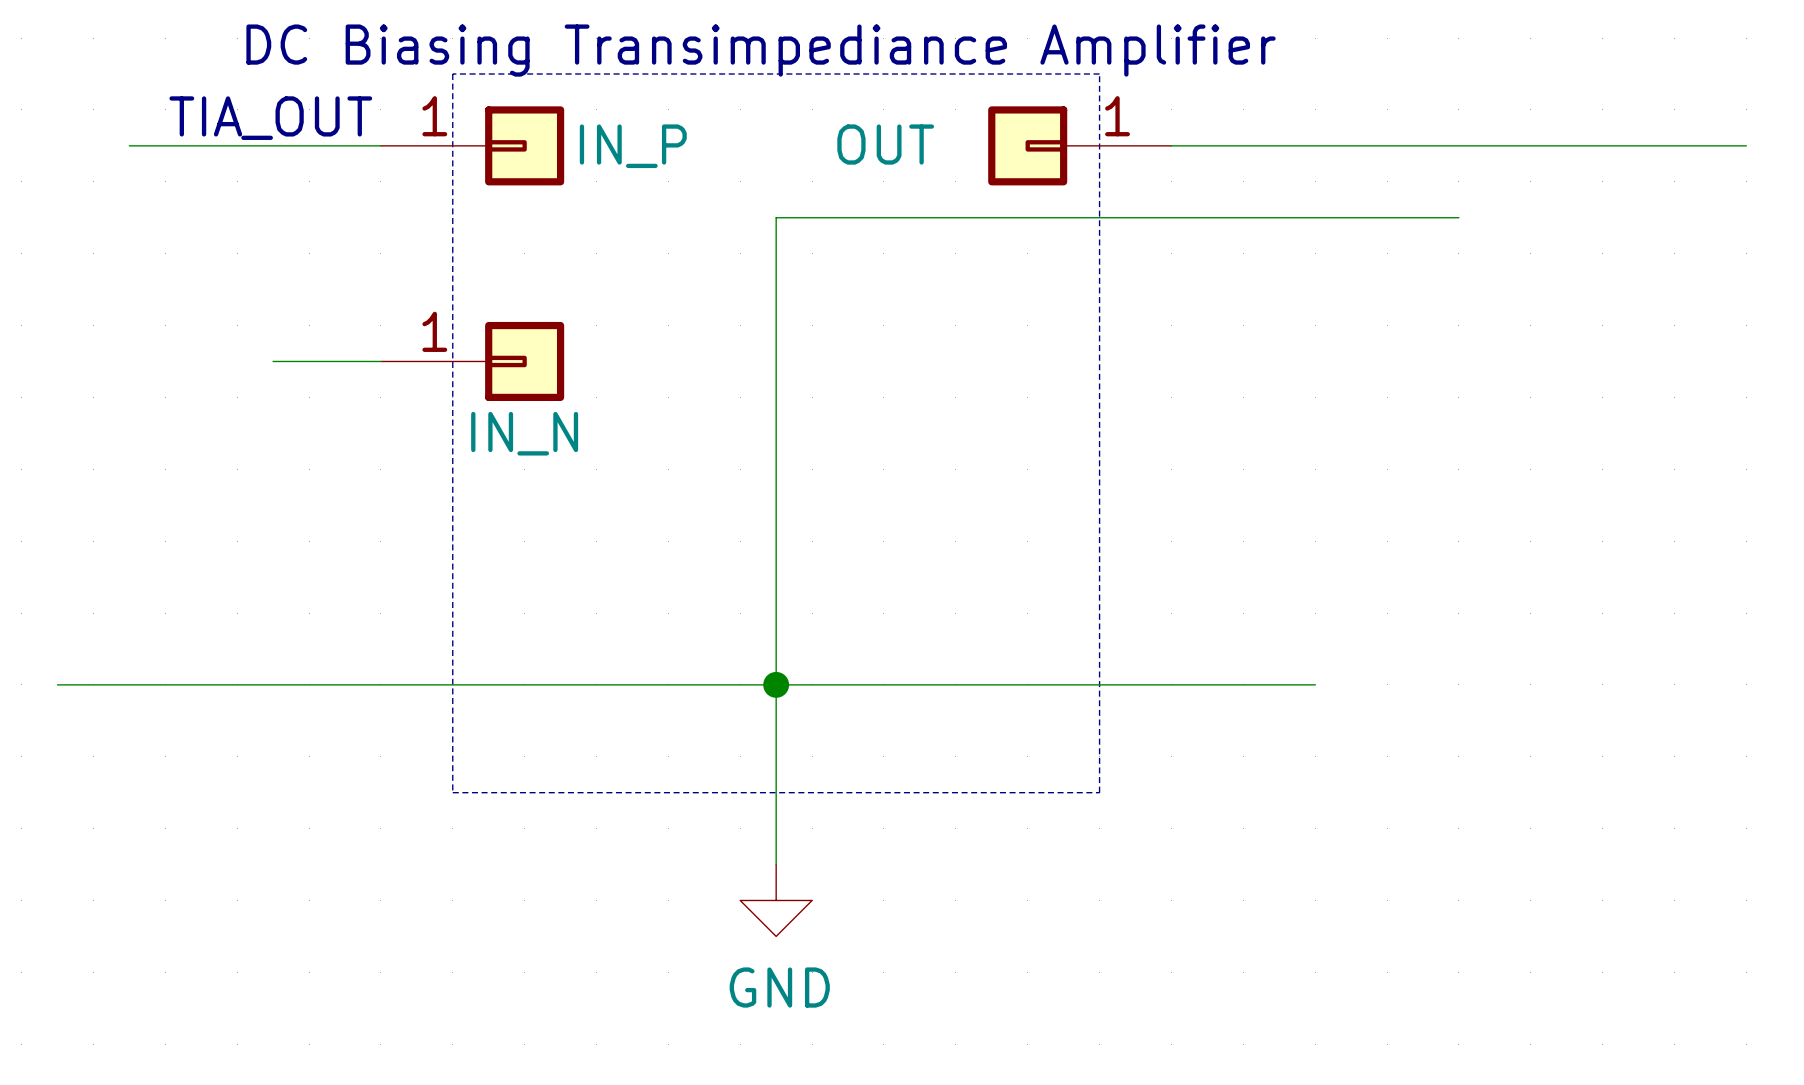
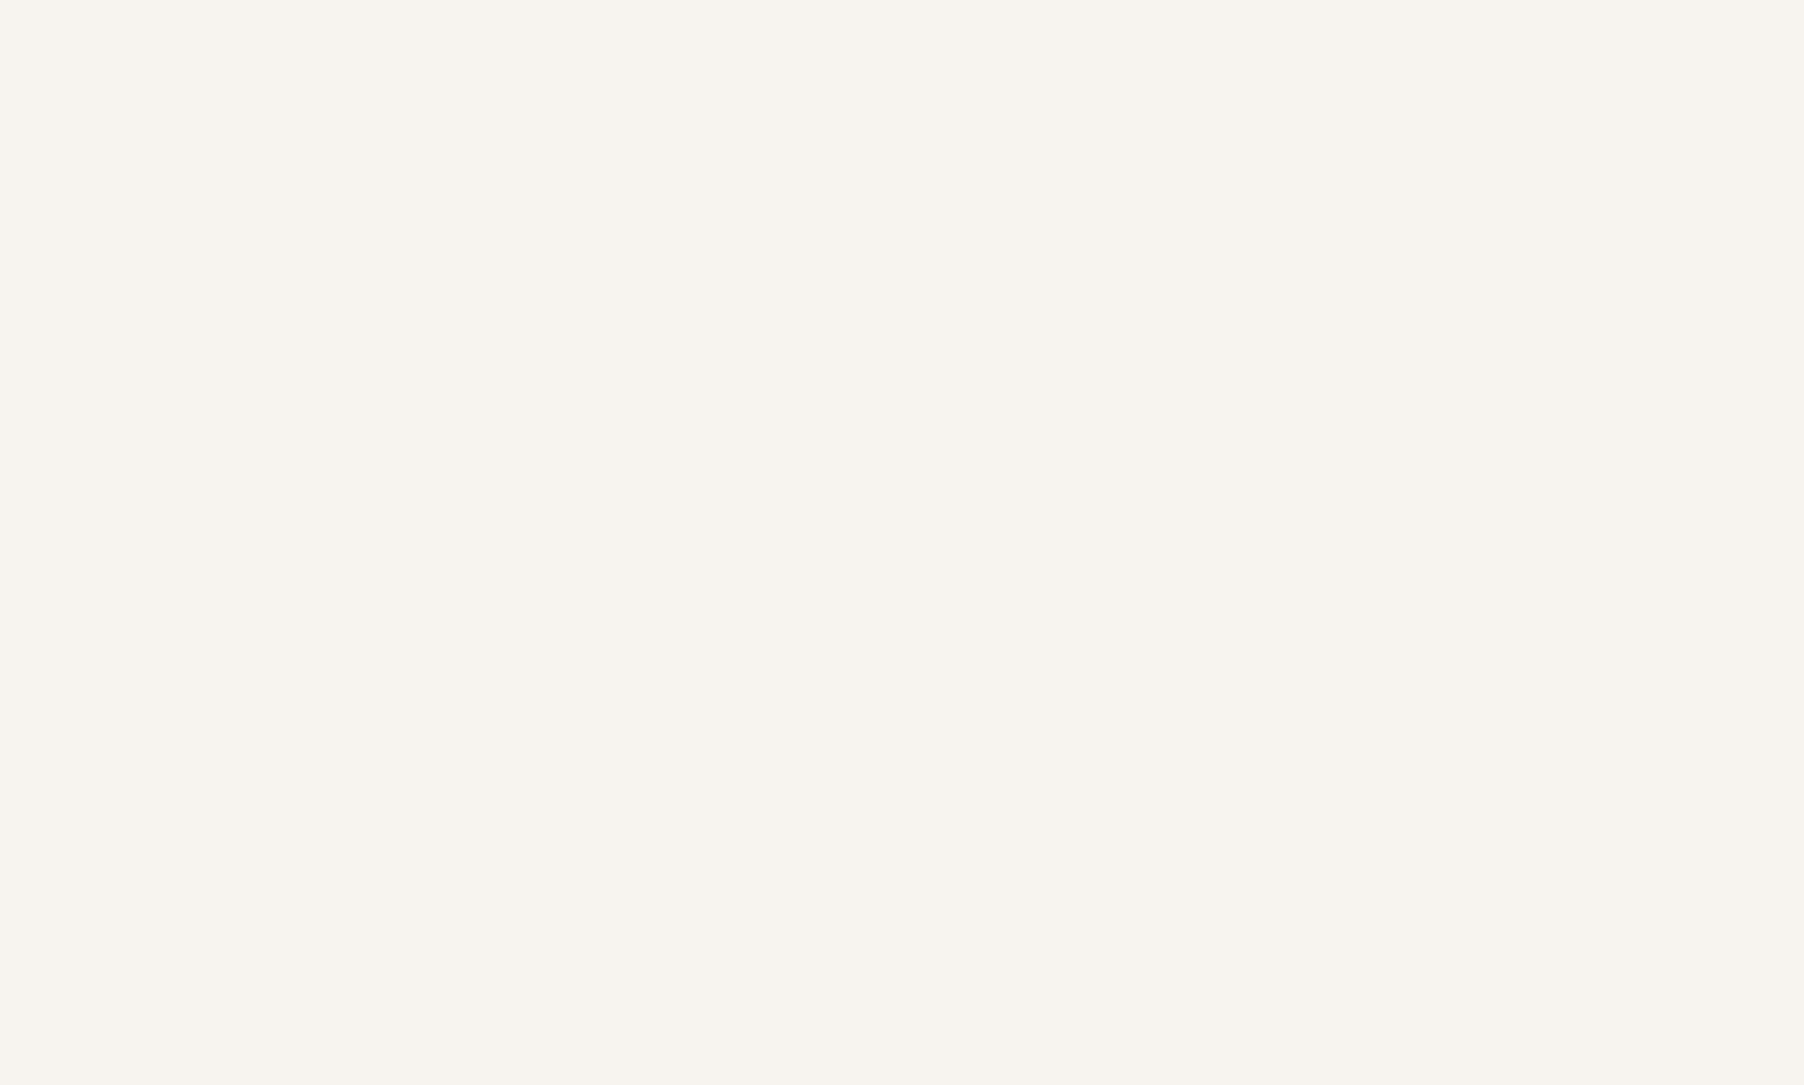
text: DC Biasing Transimpediance Amplifier (761, 50) -> none
line: (452, 74) (452, 792) (1099, 792) (1099, 74) (452, 74) -> none
text: TIA_OUT (270, 118) -> none
wire: (129, 145) (380, 145) -> none
part: IN_P (472, 145) -> none
part: OUT (1079, 145) -> none
wire: (1171, 145) (1746, 145) -> none
wire: (1458, 217) (776, 217) (776, 864) -> none
wire: (273, 361) (380, 361) -> none
part: IN_N (472, 361) -> none
wire: (57, 684) (1315, 684) -> none
junction: (776, 684) -> none
power symbol: GND (776, 900) -> none

